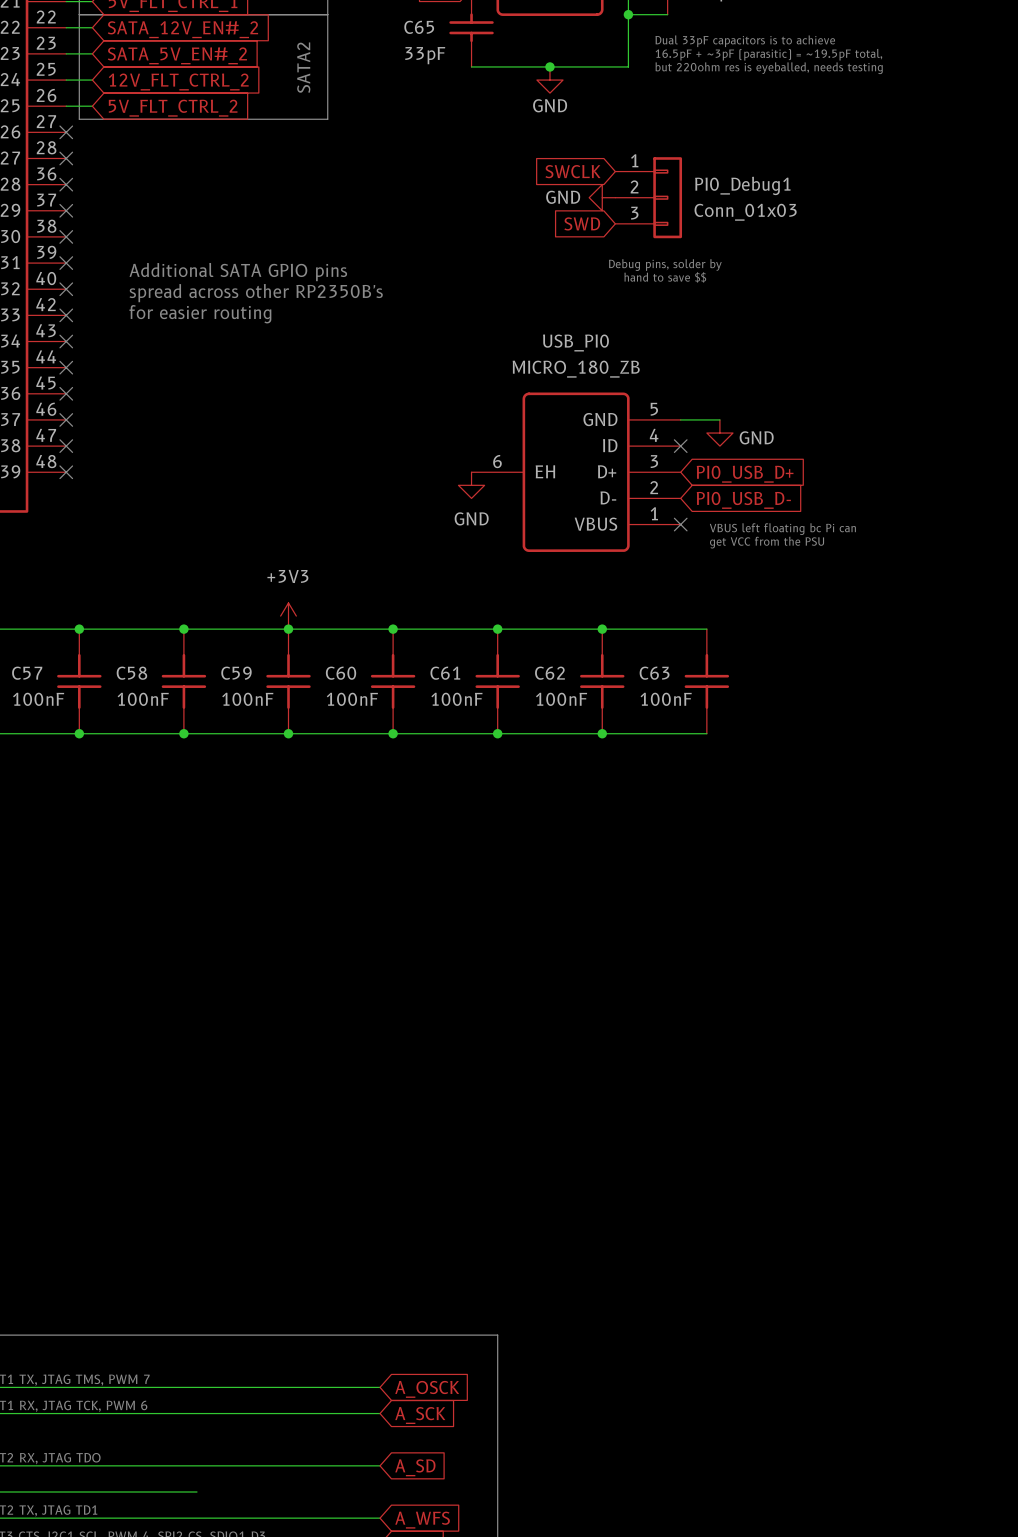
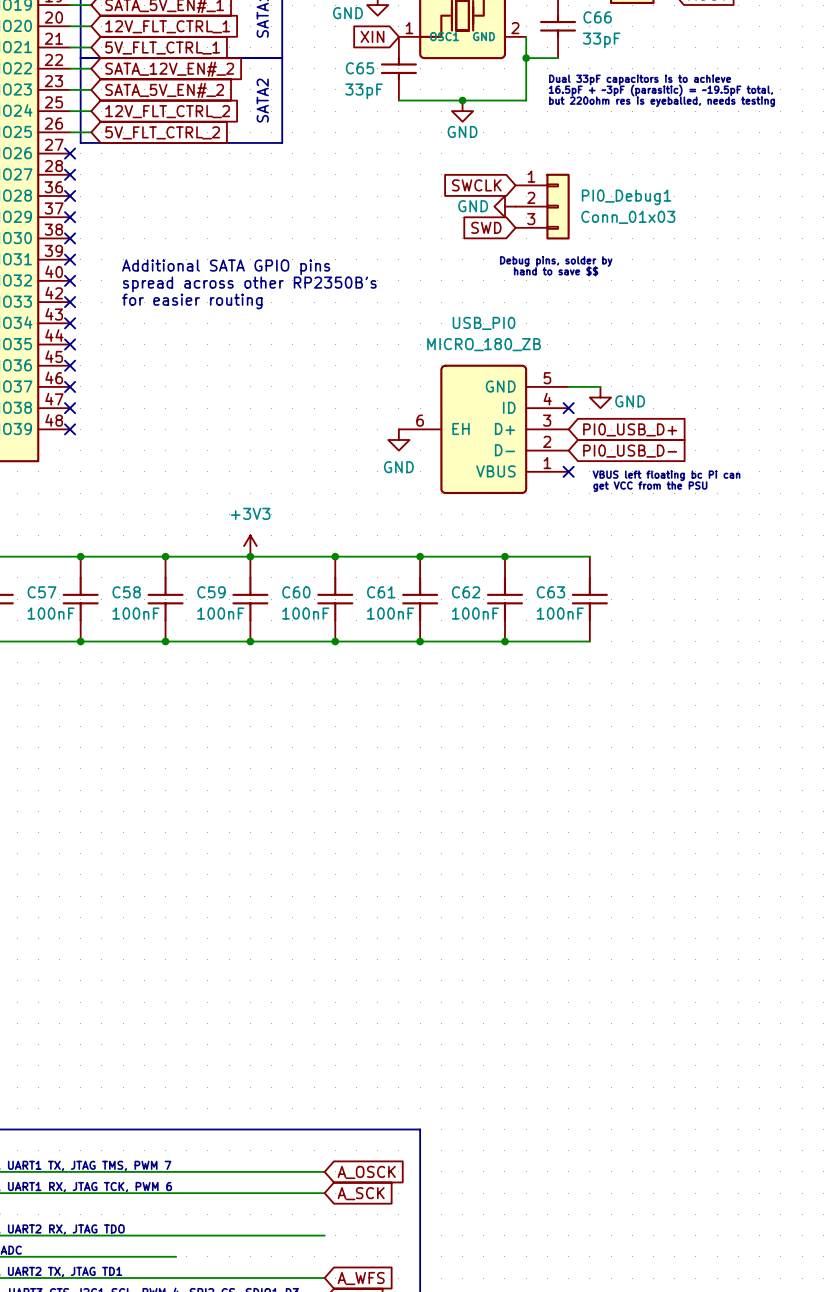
global label: A_SD (415, 1467) -> none

